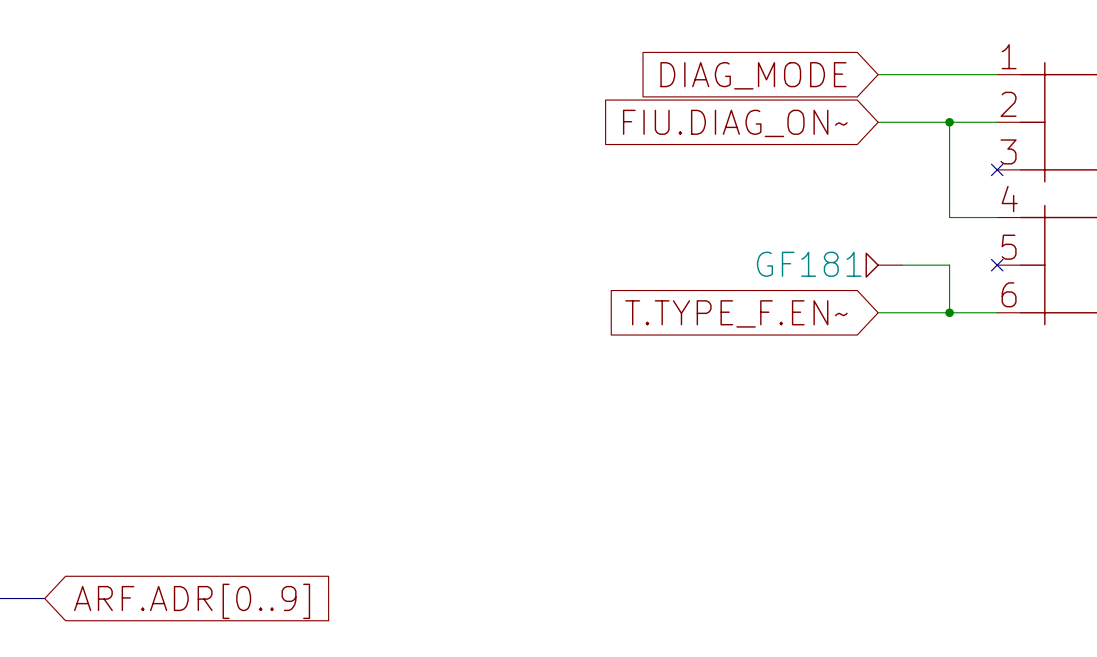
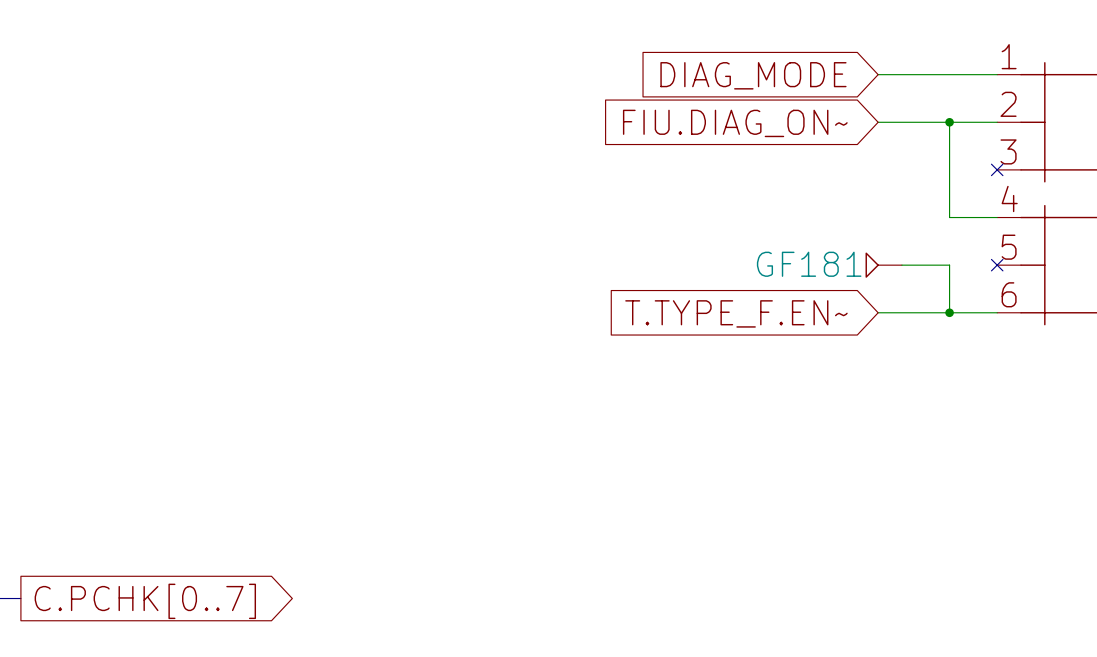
bus: (20, 598) (44, 598) -> none
global label: none -> C.PCHK[0..7] (145, 601)
global label: ARF.ADR[0..9] (192, 601) -> none

